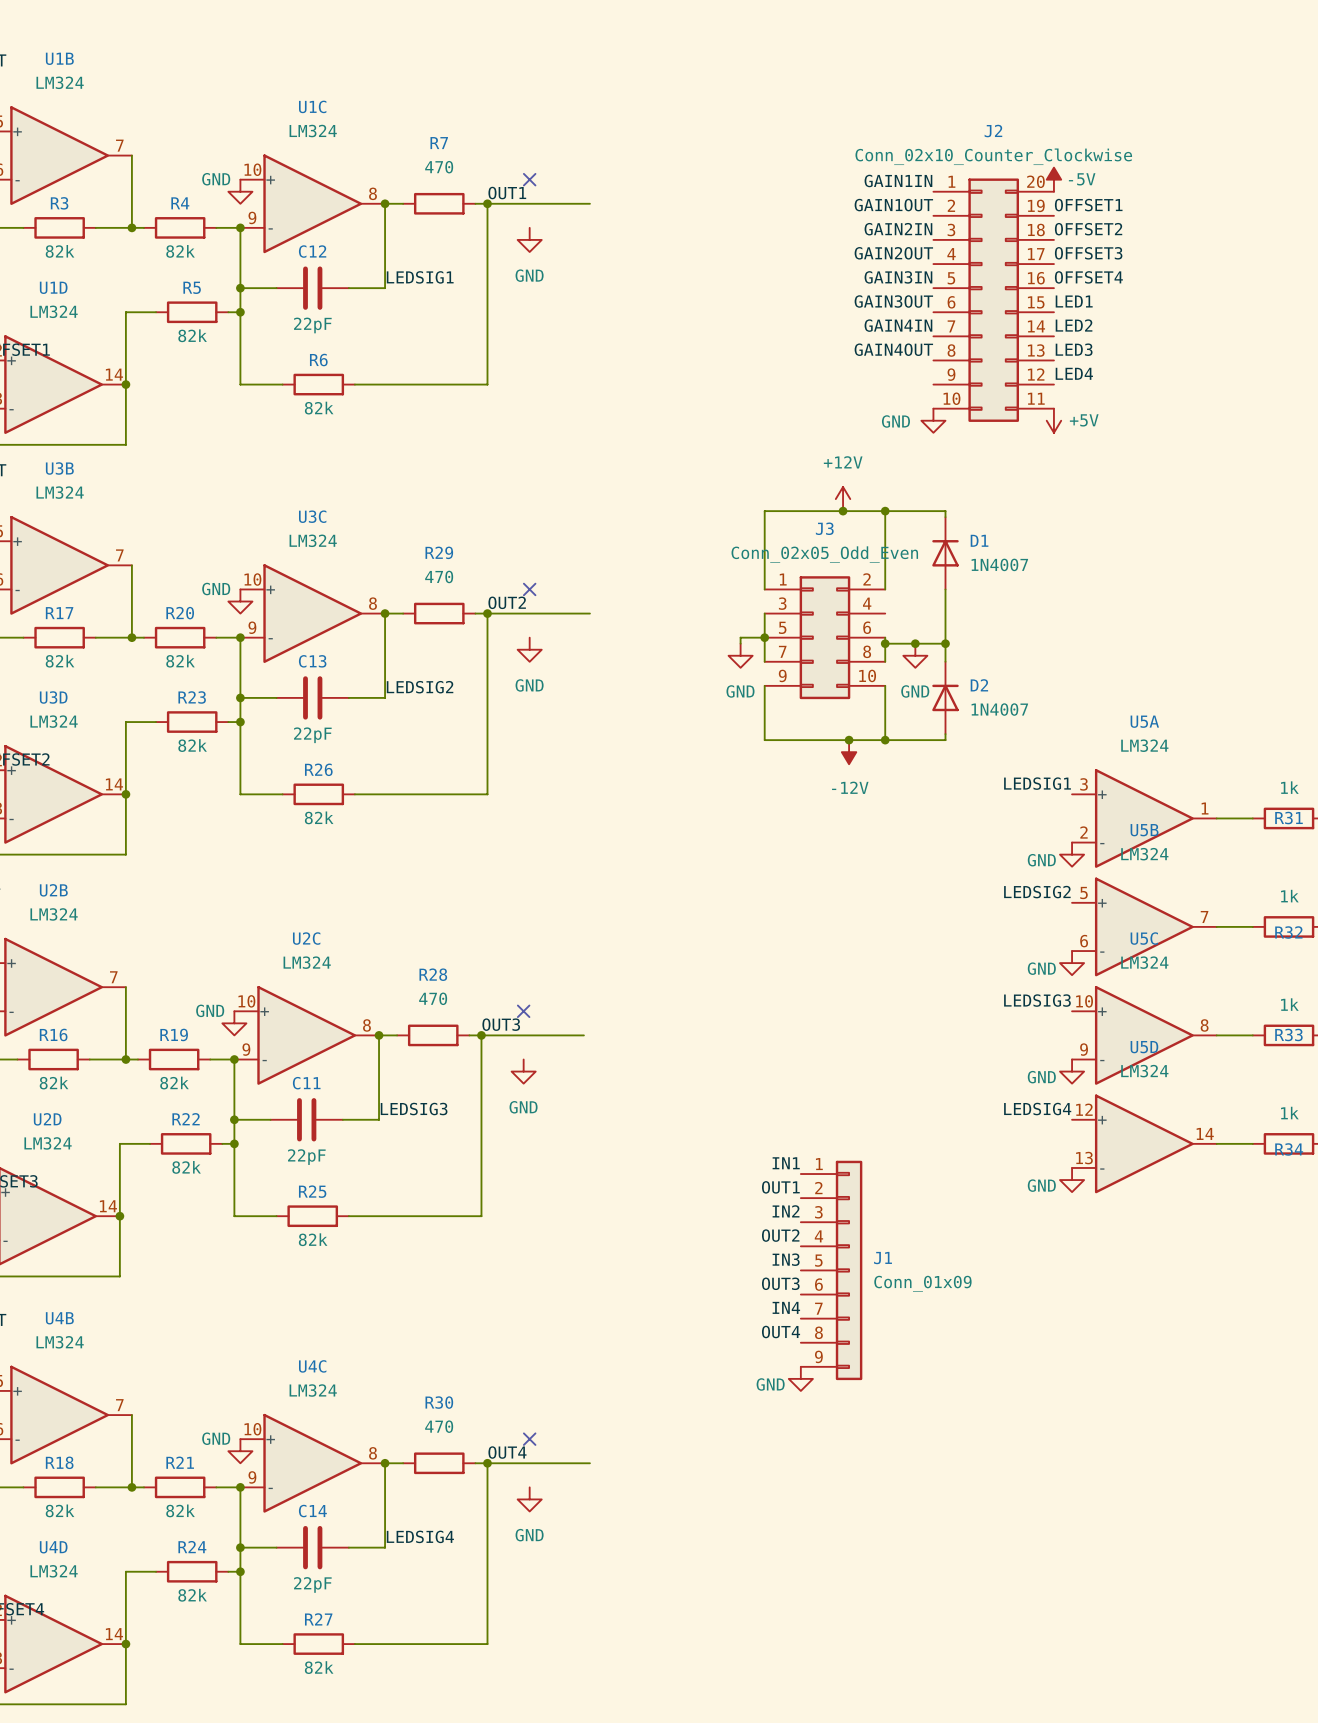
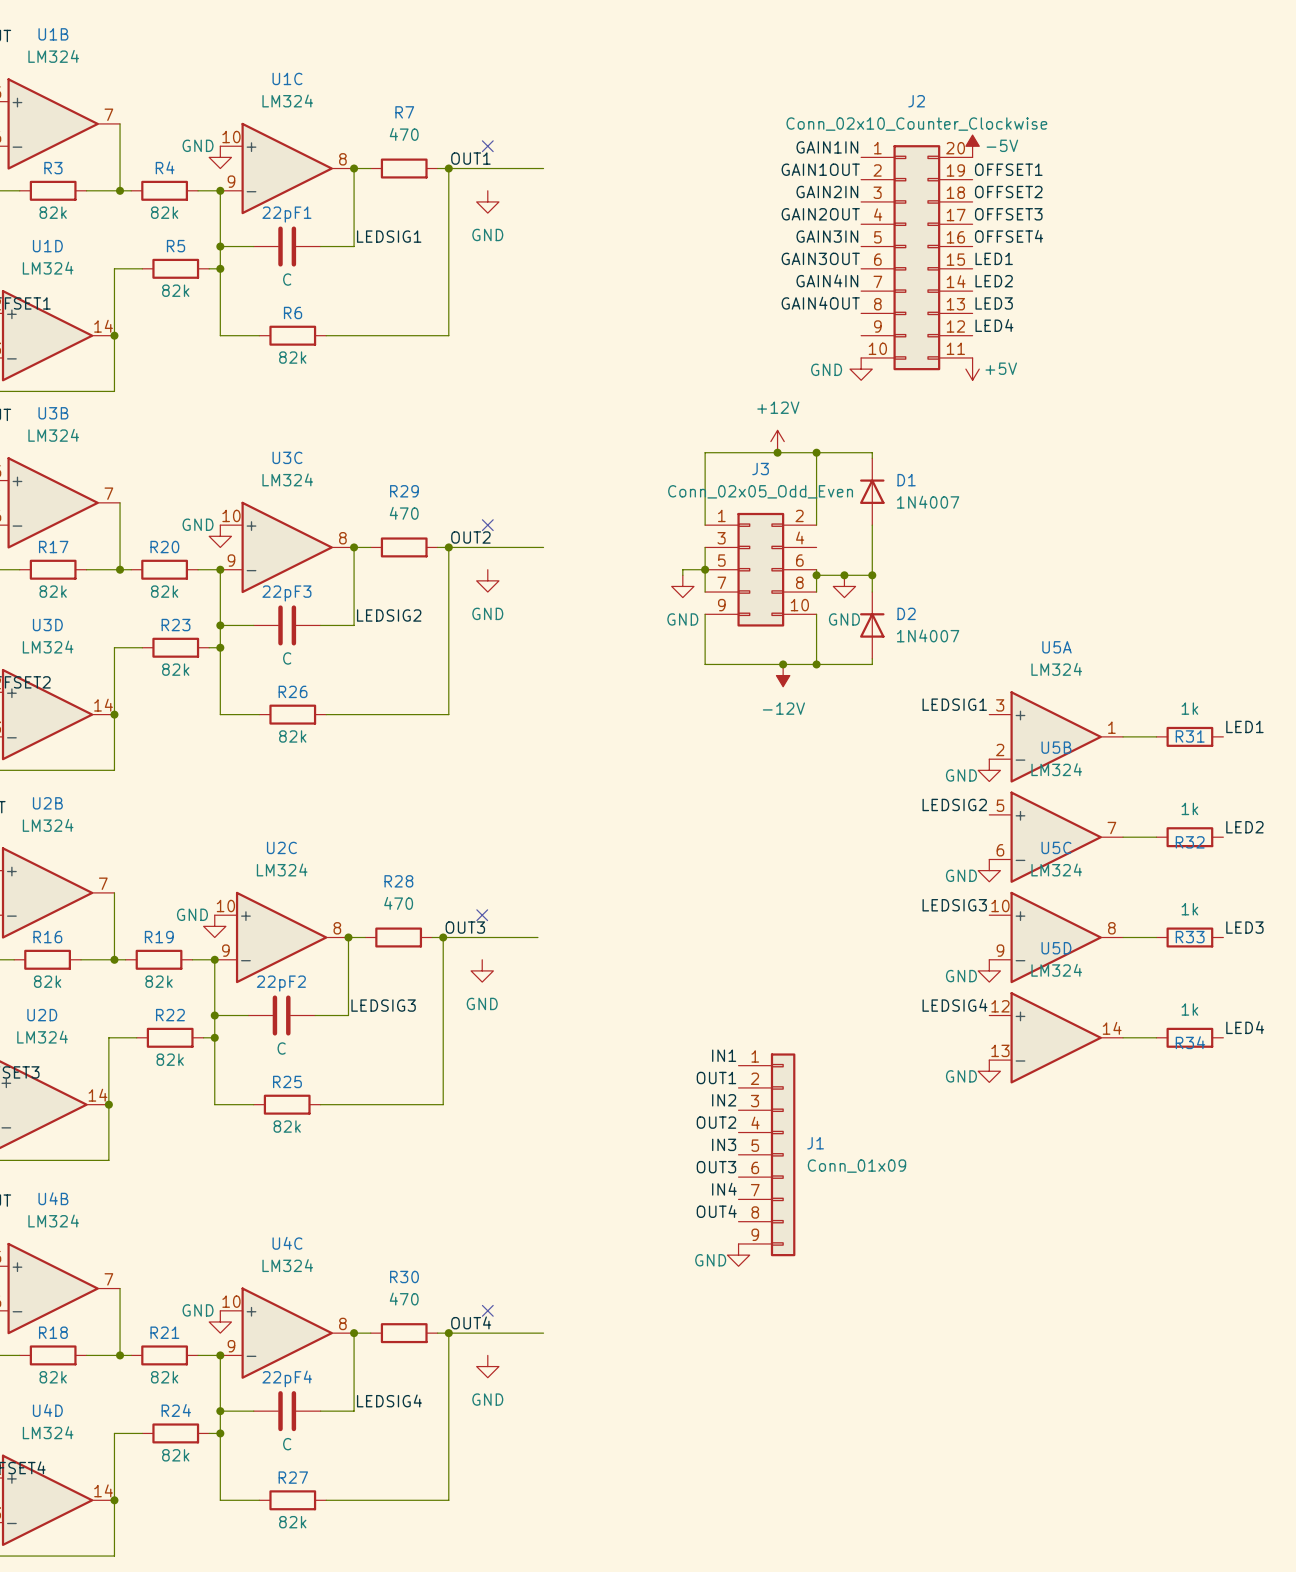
C12 name: C12 (312, 251) -> 22pF1 (286, 214)
C12 value: 22pF (312, 325) -> C (287, 279)
C13 name: C13 (312, 661) -> 22pF3 (286, 593)
C13 value: 22pF (312, 735) -> C (287, 658)
C11 name: C11 (306, 1083) -> 22pF2 (281, 983)
C11 value: 22pF (306, 1157) -> C (281, 1048)
C14 name: C14 (312, 1511) -> 22pF4 (287, 1378)
C14 value: 22pF (312, 1584) -> C (287, 1444)

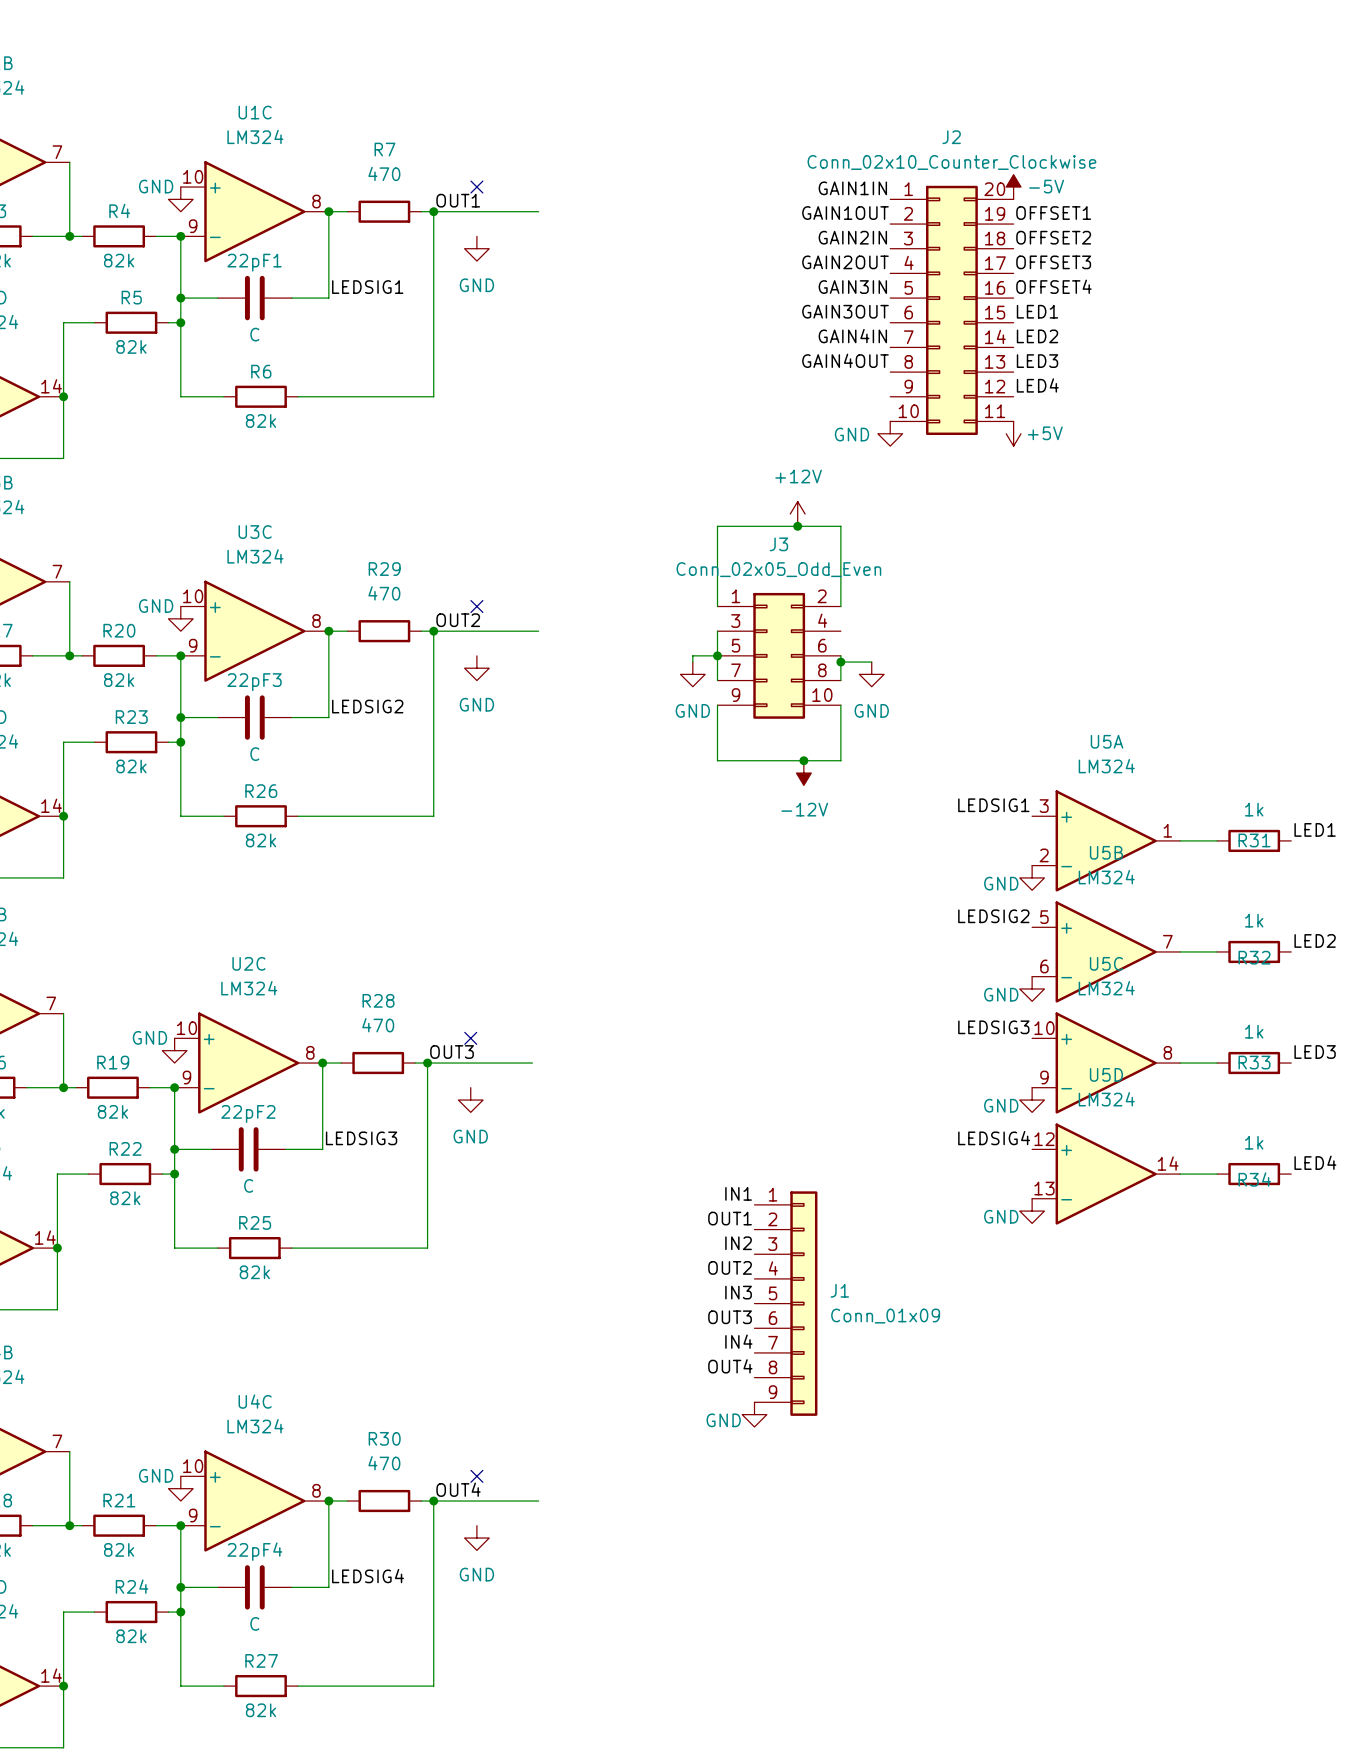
wire: (816, 452) (872, 452) (872, 458) -> none
junction: (816, 452) -> none
D1: 1N4007 (872, 491) -> none
wire: (872, 525) (872, 592) -> none
wire: (844, 575) (872, 575) -> none
junction: (844, 575) -> none
junction: (872, 575) -> none
D2: 1N4007 (872, 625) -> none
wire: (872, 658) (872, 664) (816, 664) -> none
junction: (816, 664) -> none

